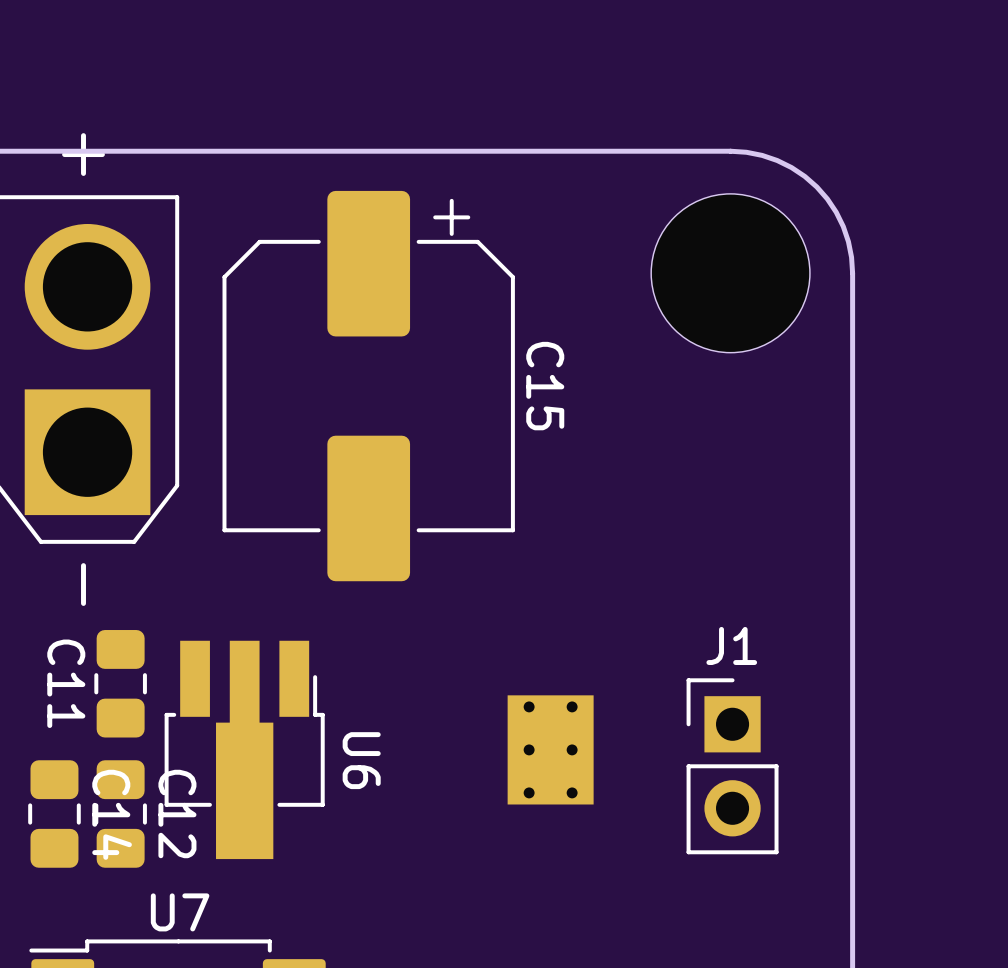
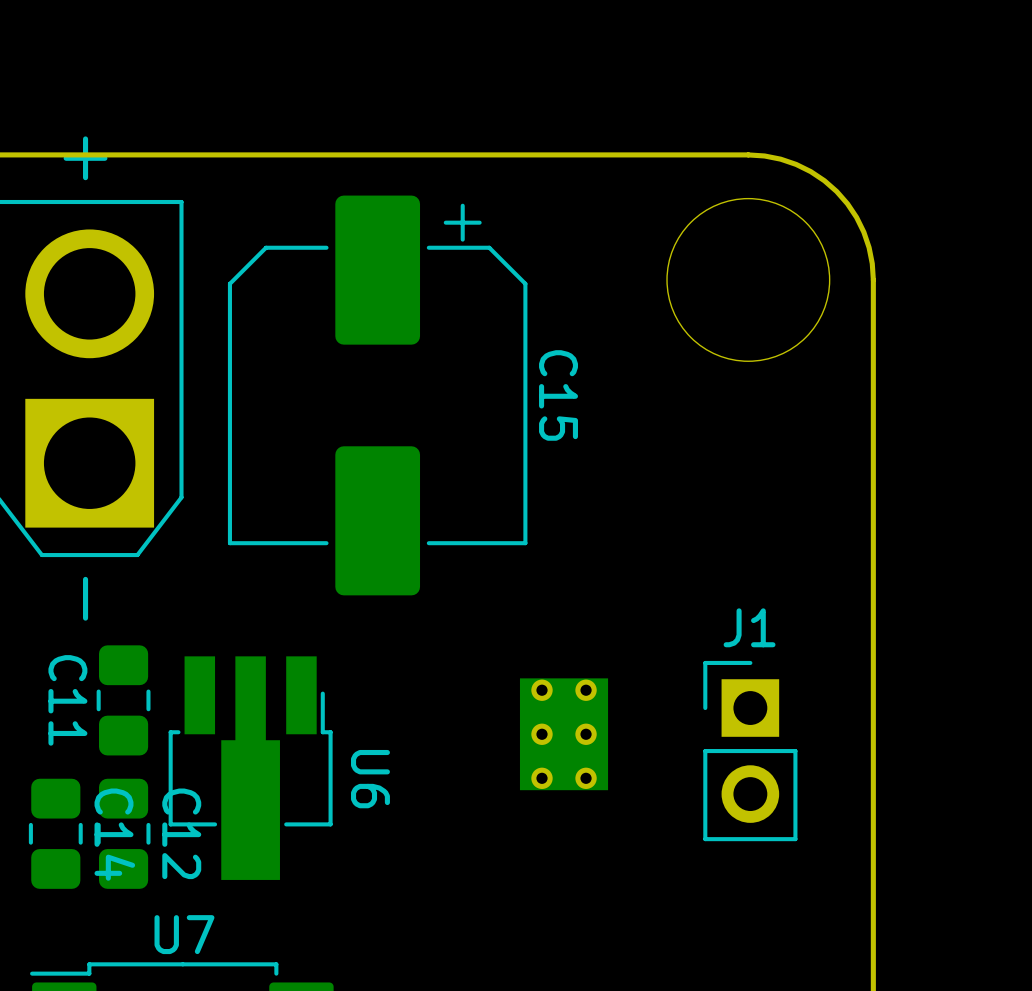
part position: (550, 749) -> (564, 734)
J1 position: (732, 766) -> (750, 751)

